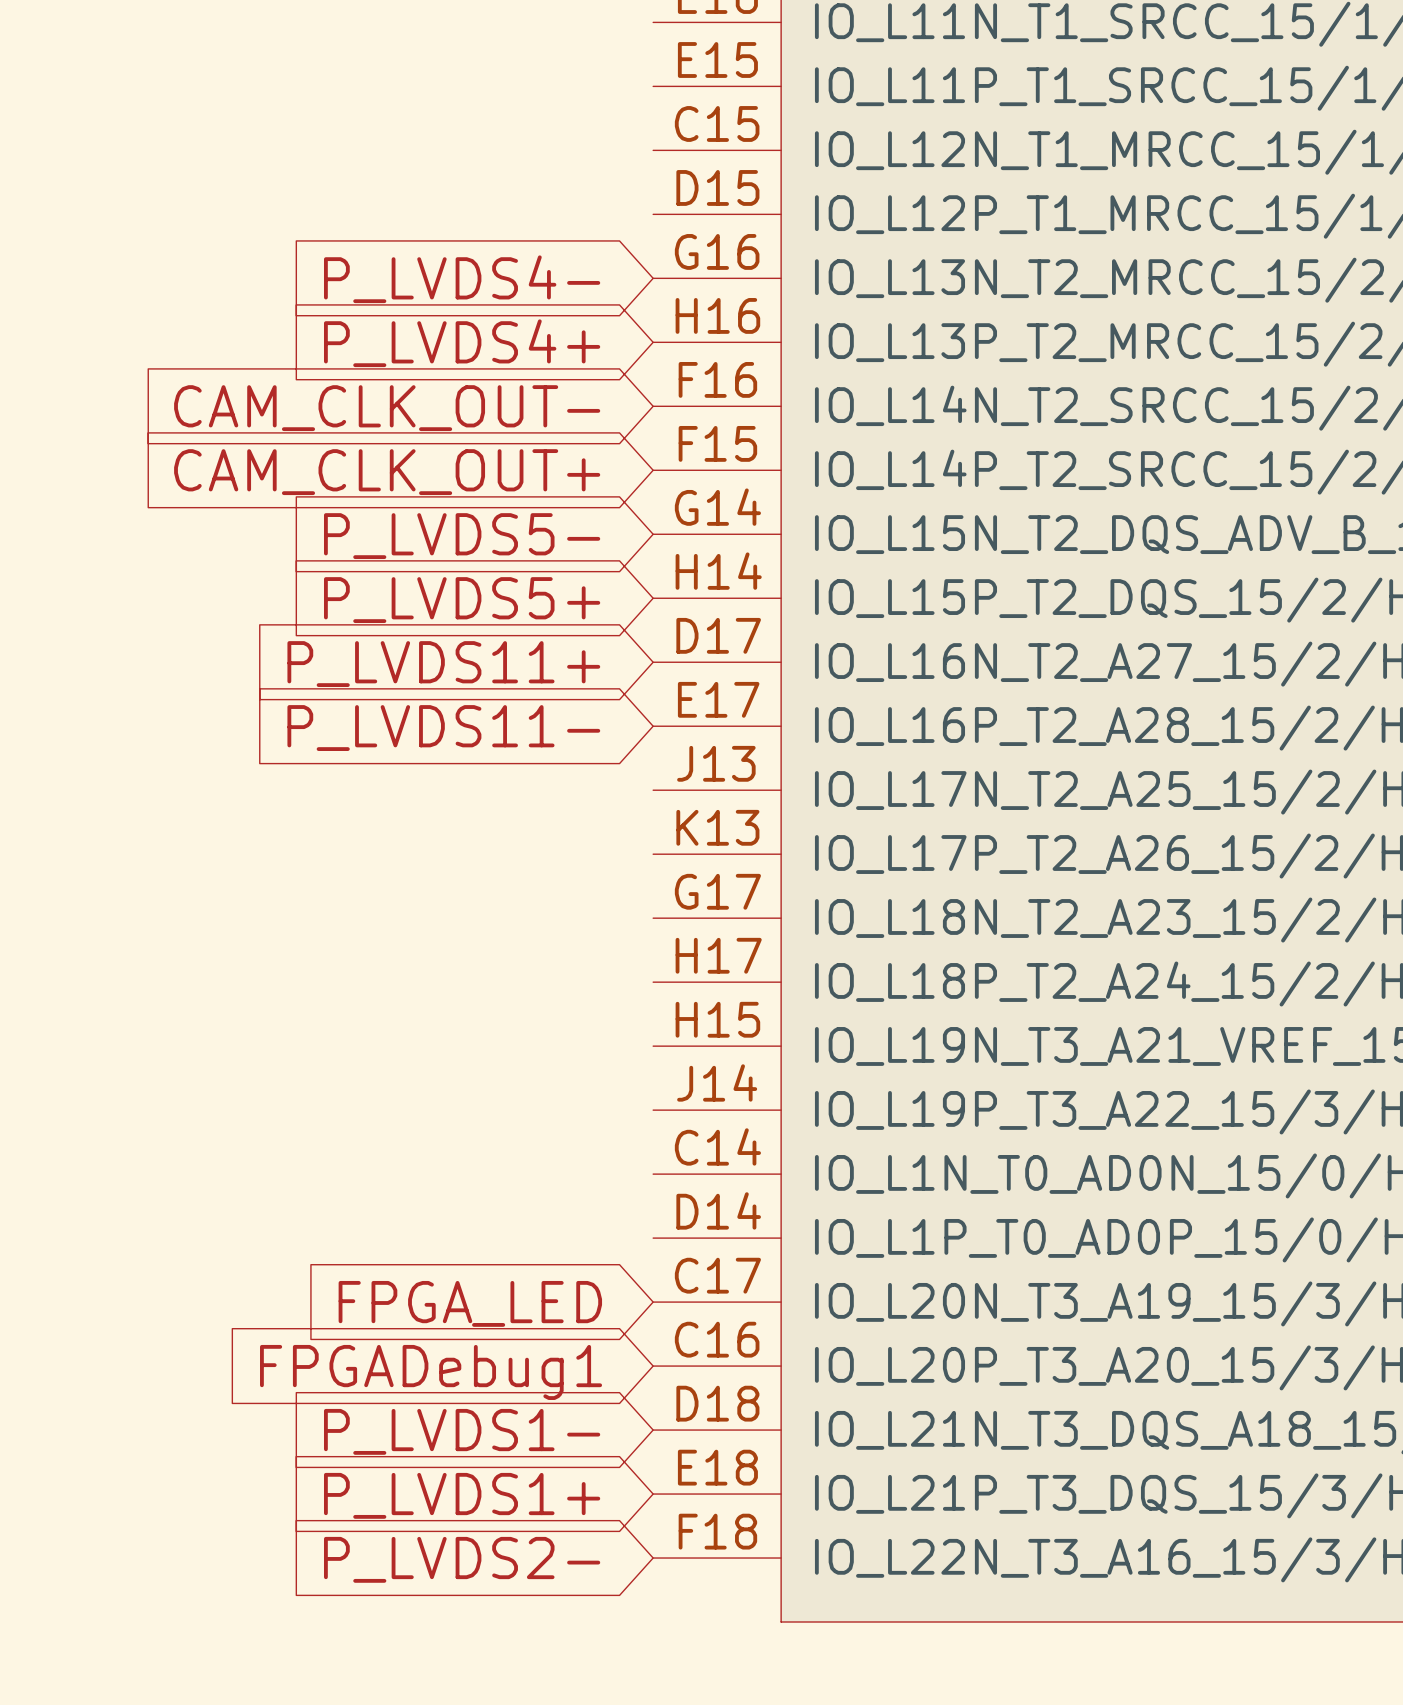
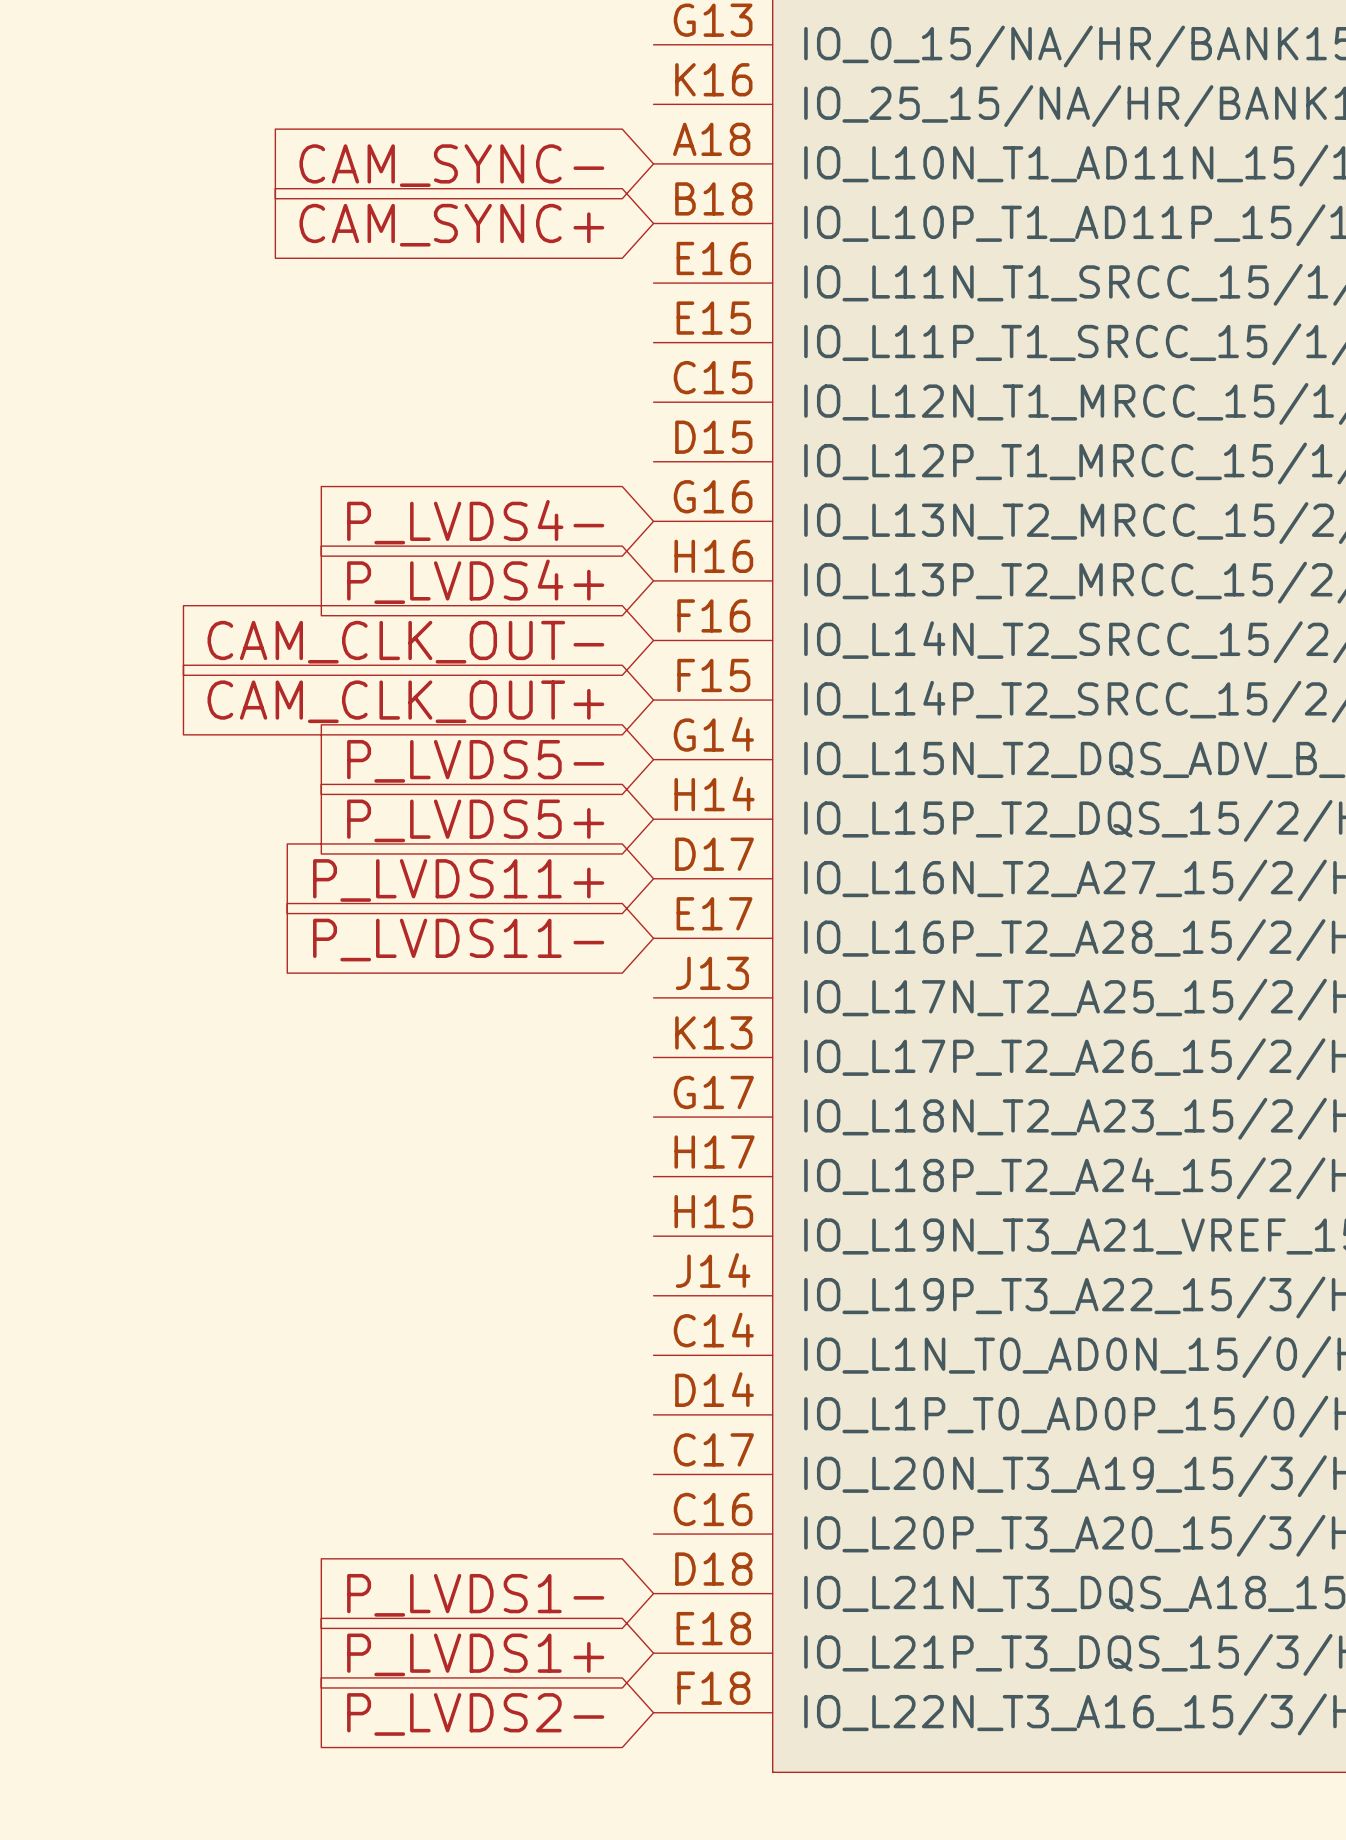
global label: FPGA_LED (470, 1303) -> none
global label: FPGADebug1 (431, 1372) -> none

